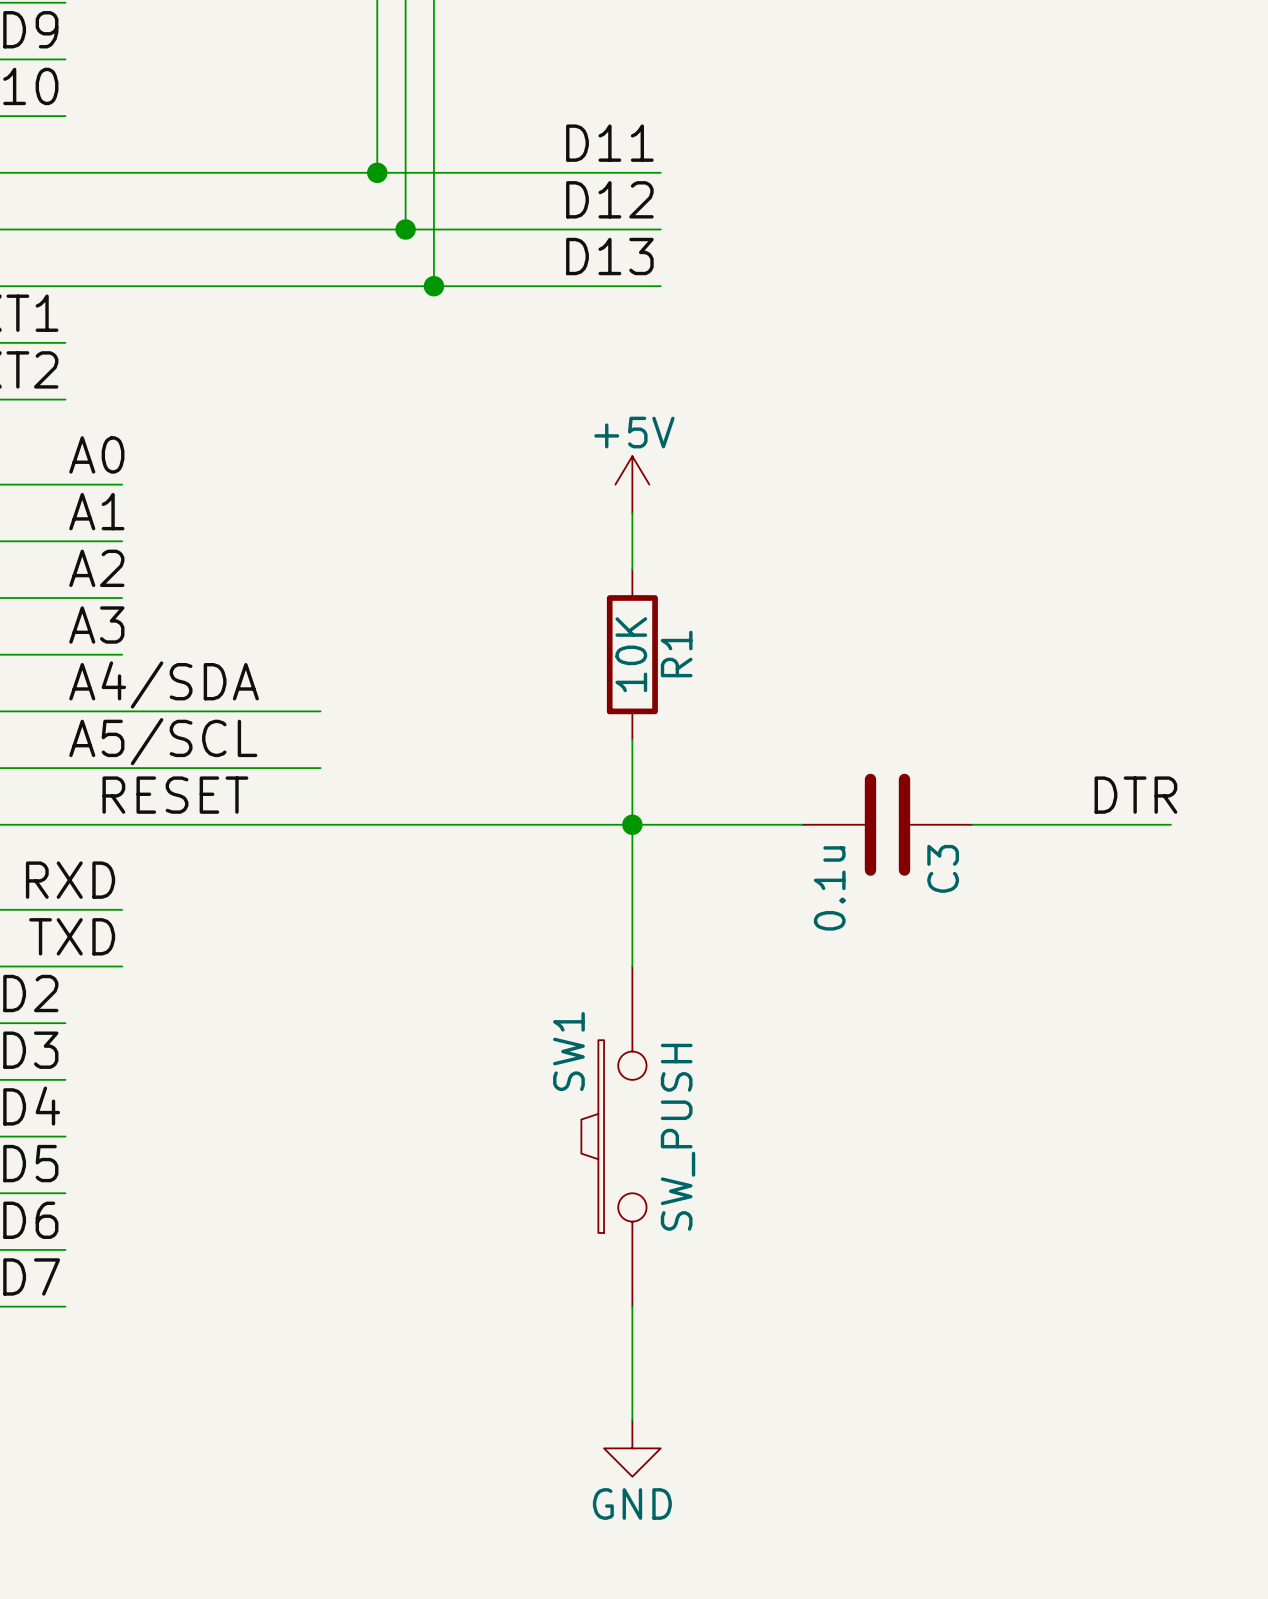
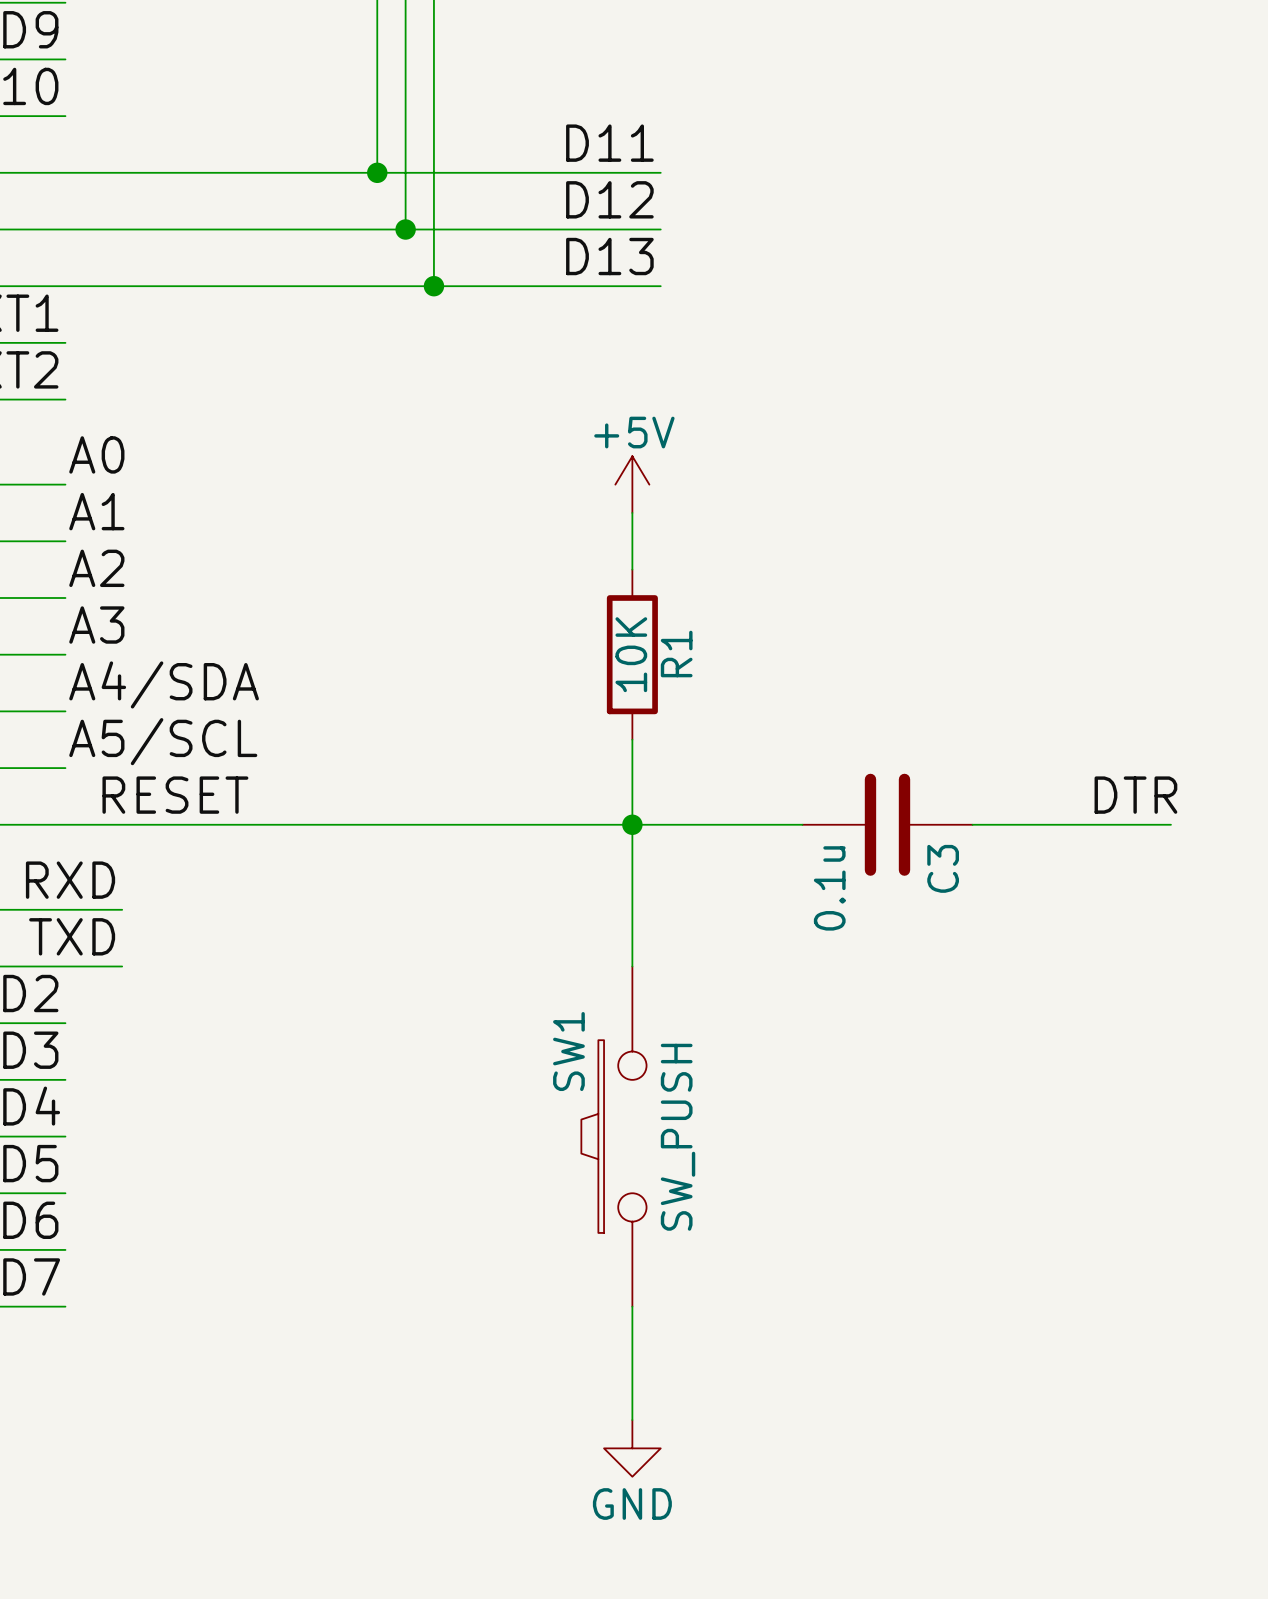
wire: (65, 484) (122, 484) -> none
wire: (65, 541) (122, 541) -> none
wire: (65, 598) (122, 598) -> none
wire: (65, 654) (122, 654) -> none
wire: (65, 711) (320, 711) -> none
wire: (65, 768) (320, 768) -> none

